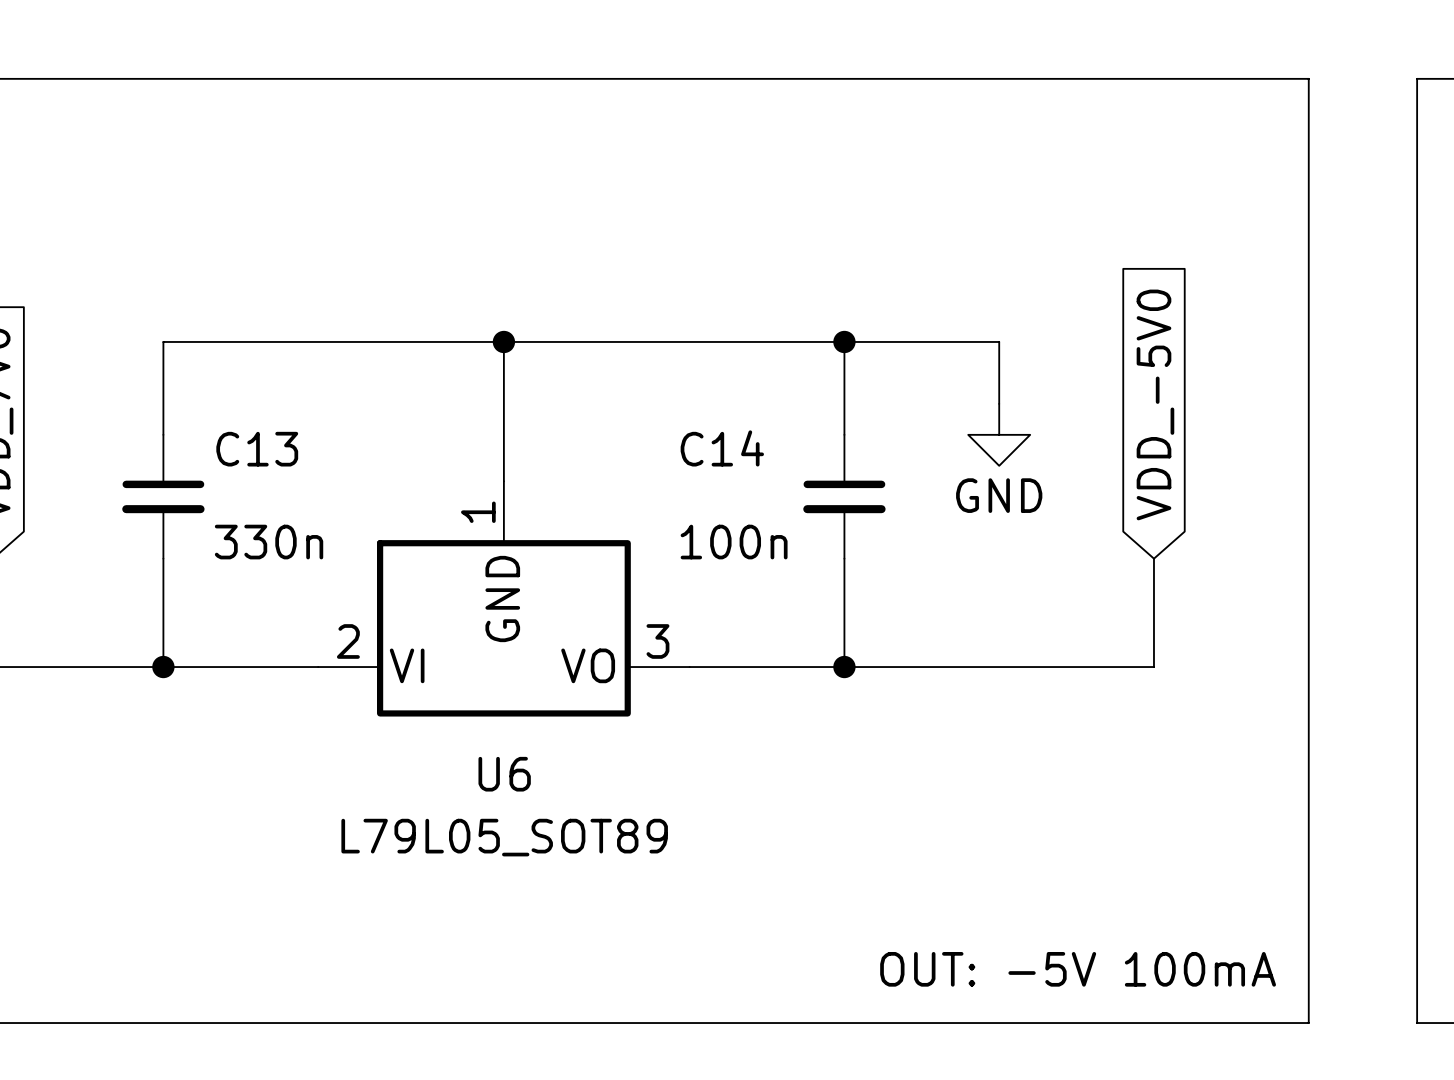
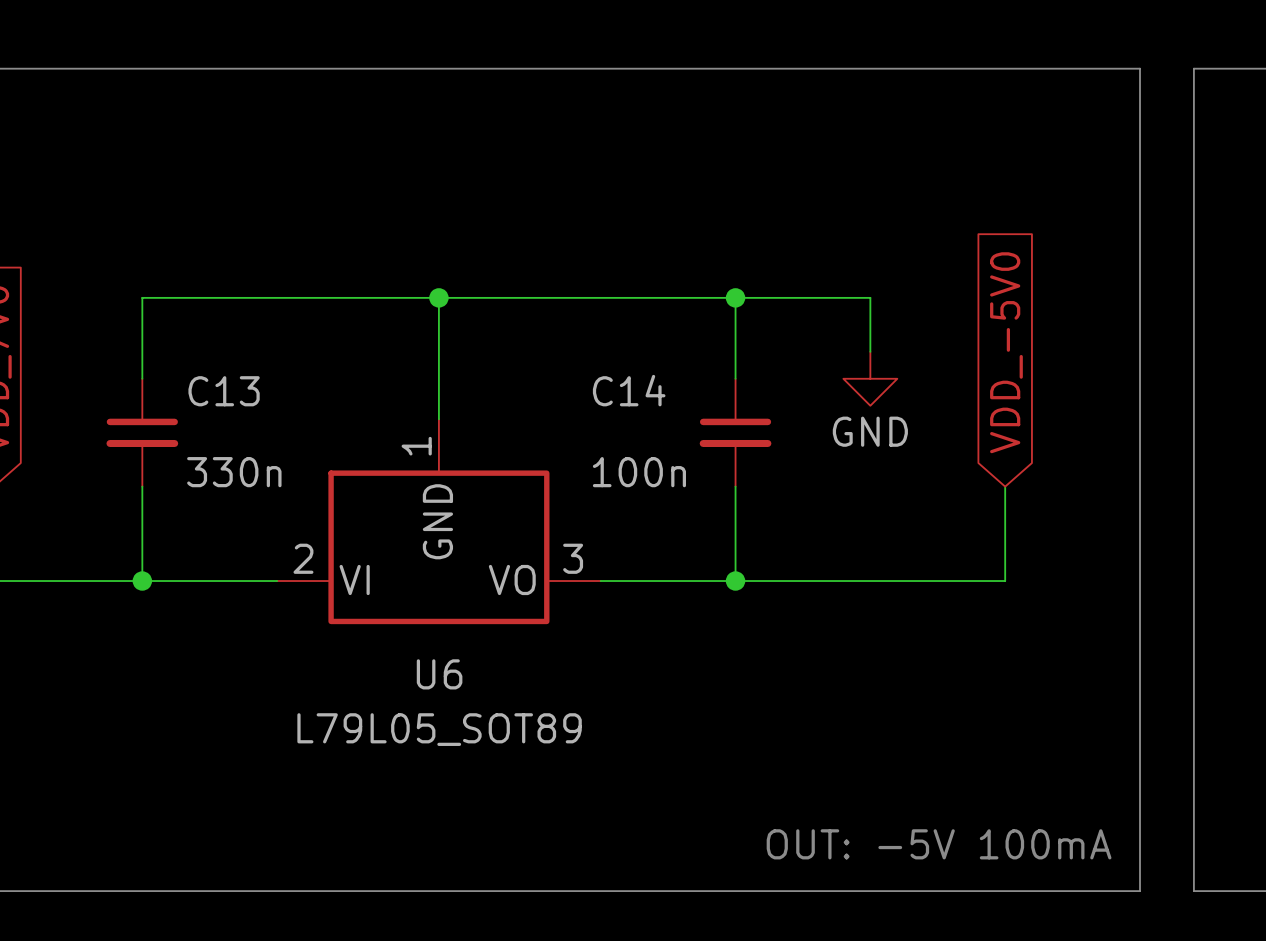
line: (1417, 78) (1417, 1023) -> (1234, 68) (1193, 68) (1193, 891) (1234, 891)

